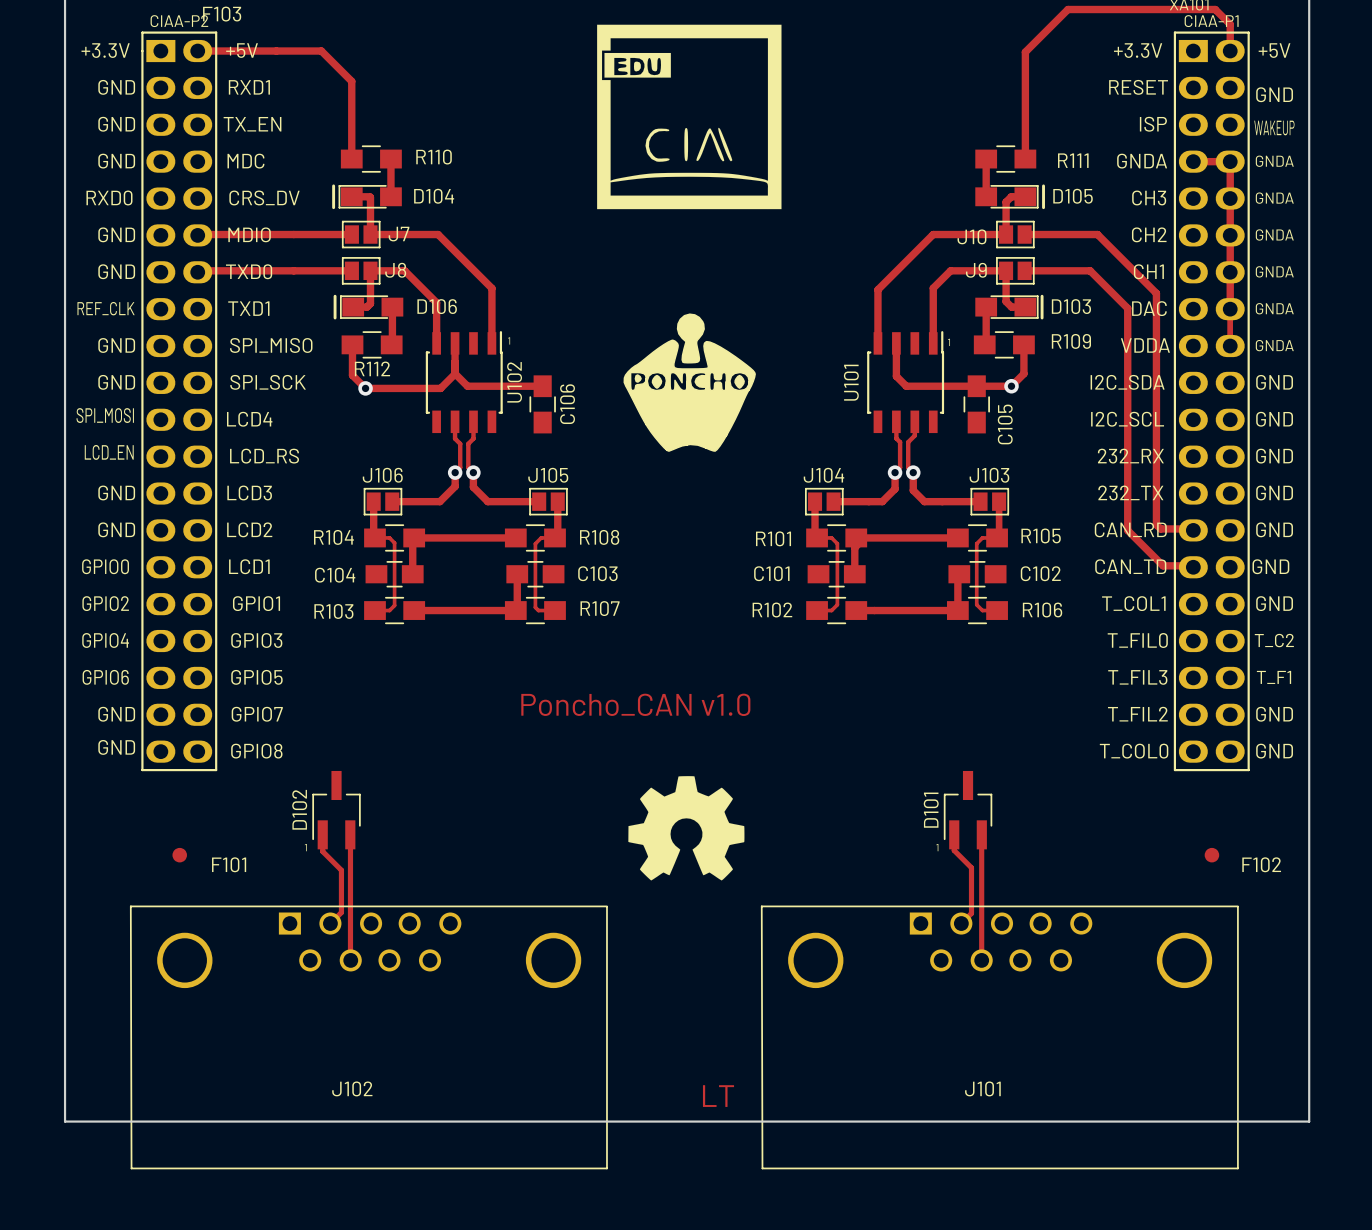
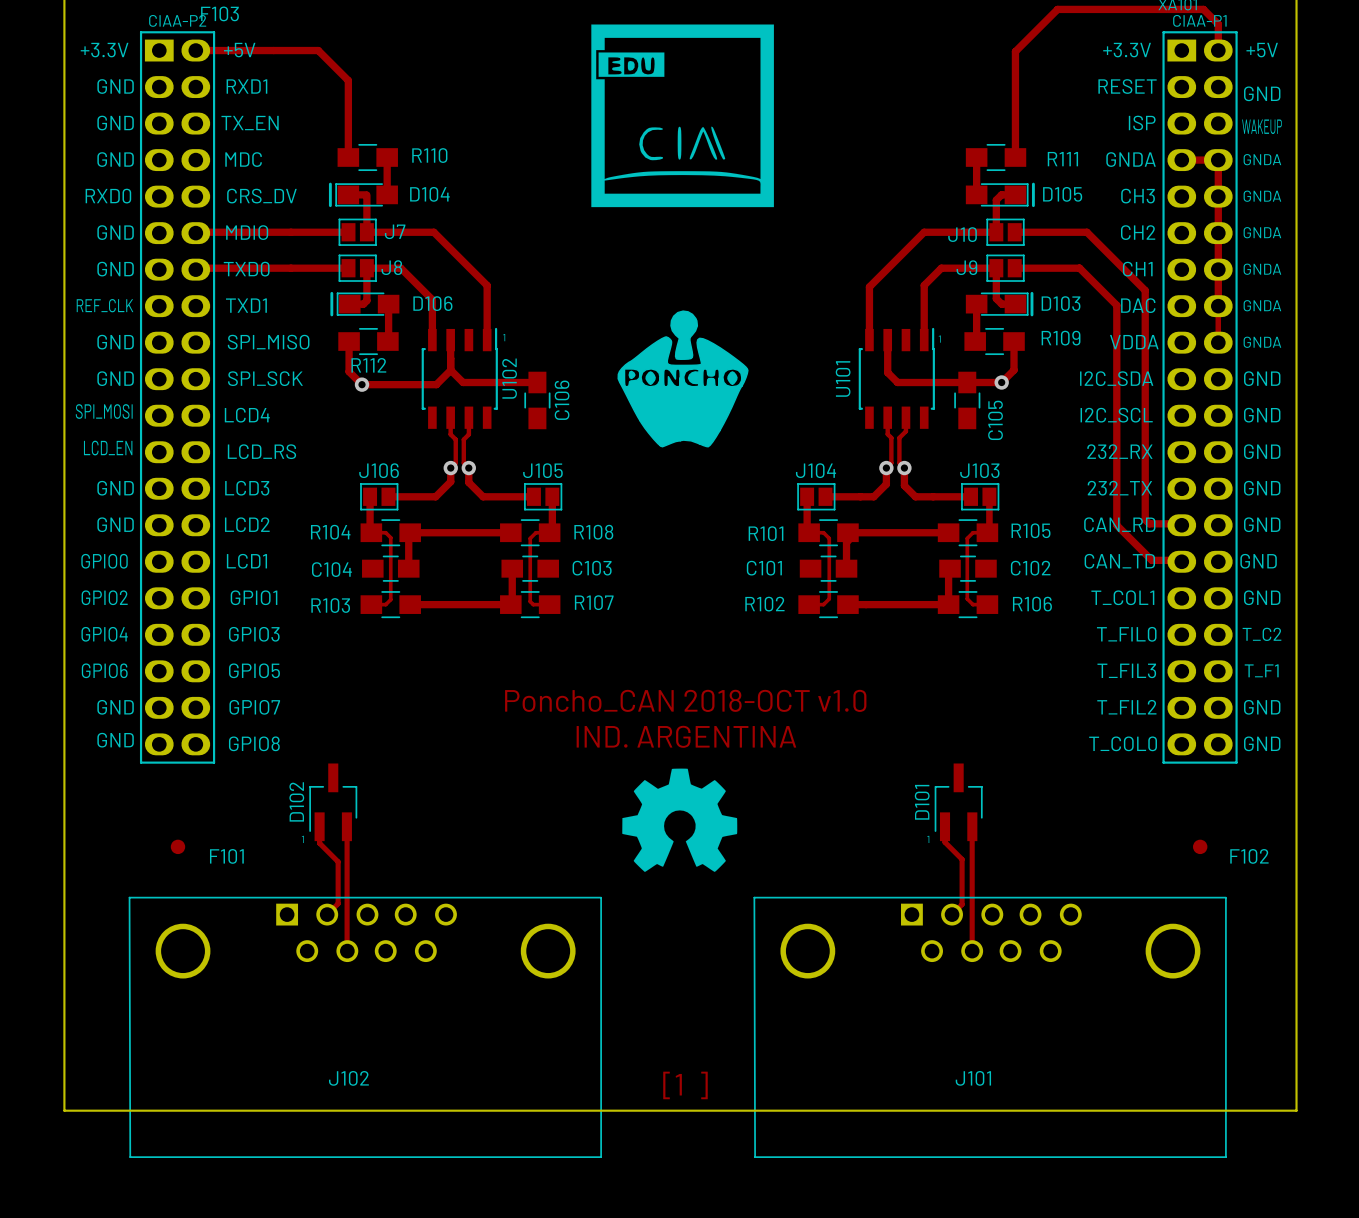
text: Poncho_CAN v1.0 (635, 704) -> Poncho_CAN 2018-OCT v1.0 (685, 700)
text: none -> IND. ARGENTINA (686, 736)
text: LT (718, 1096) -> [1 ] (685, 1085)

